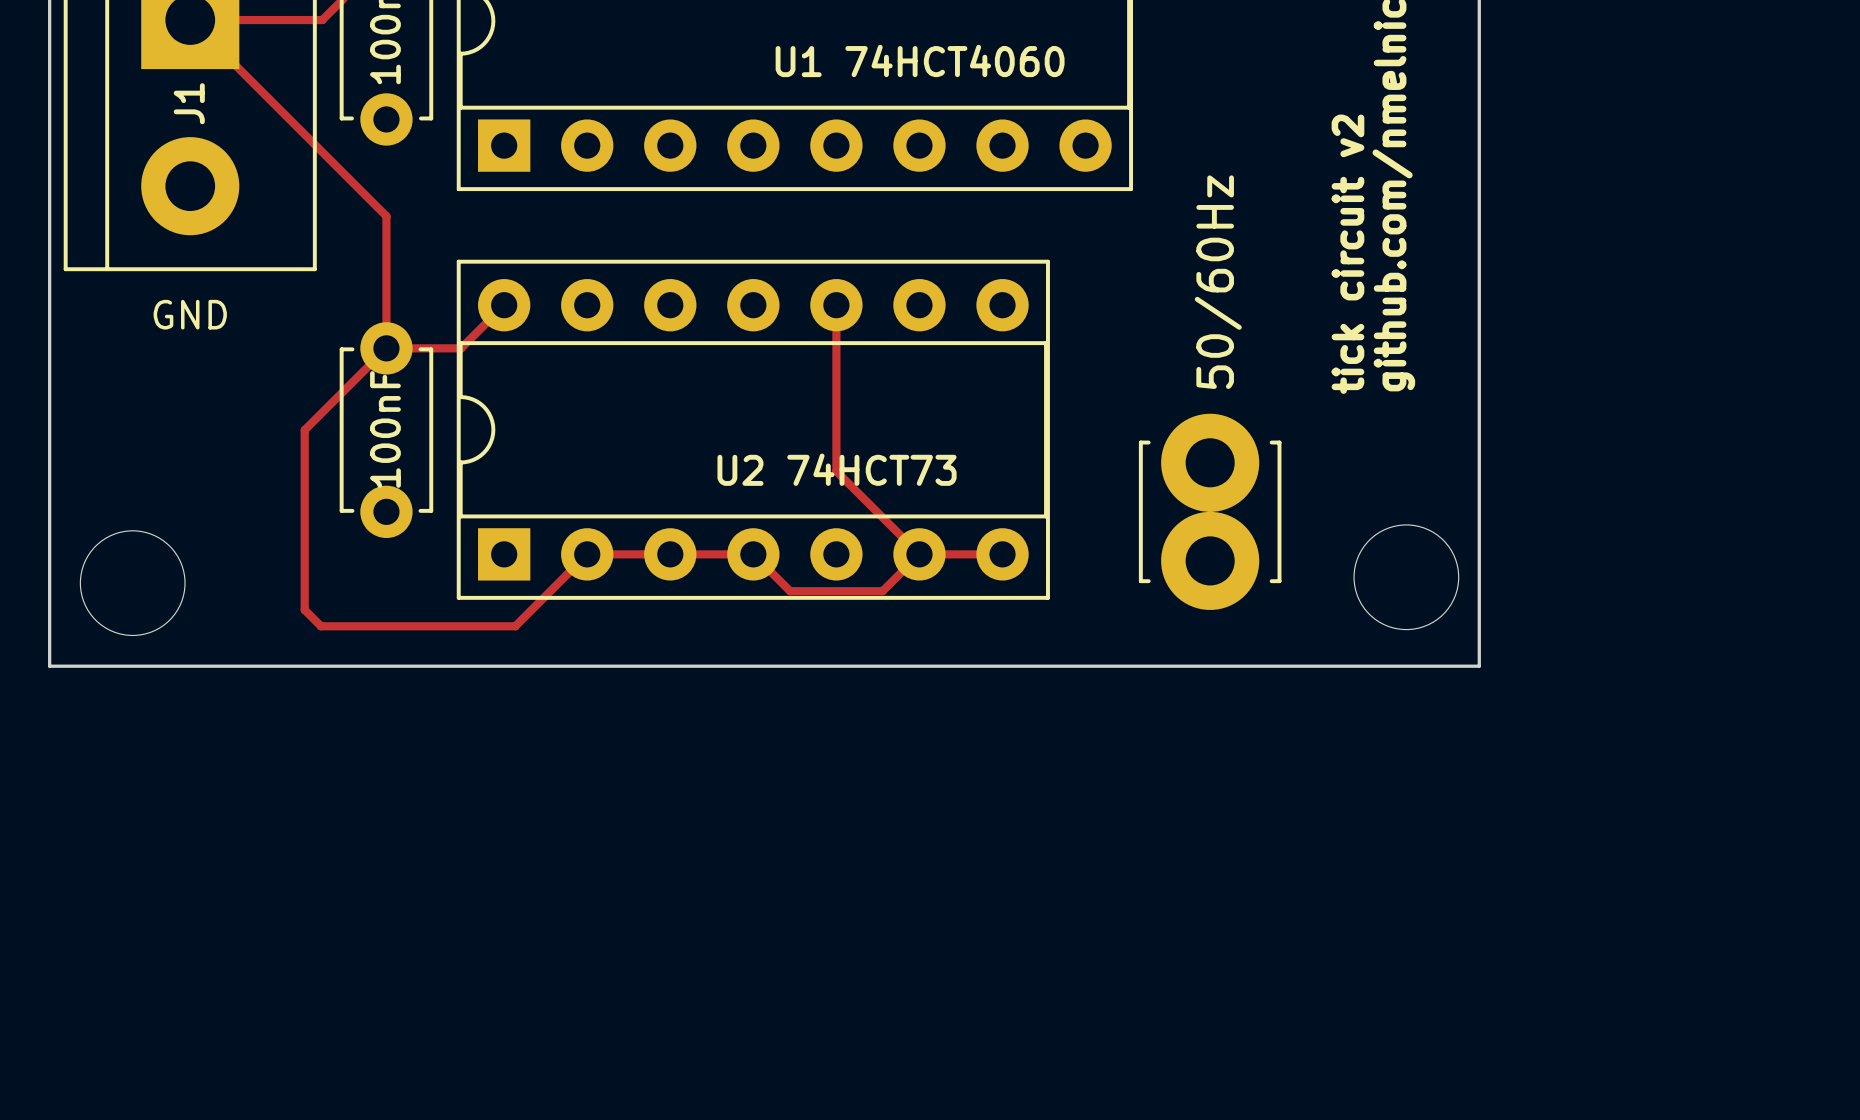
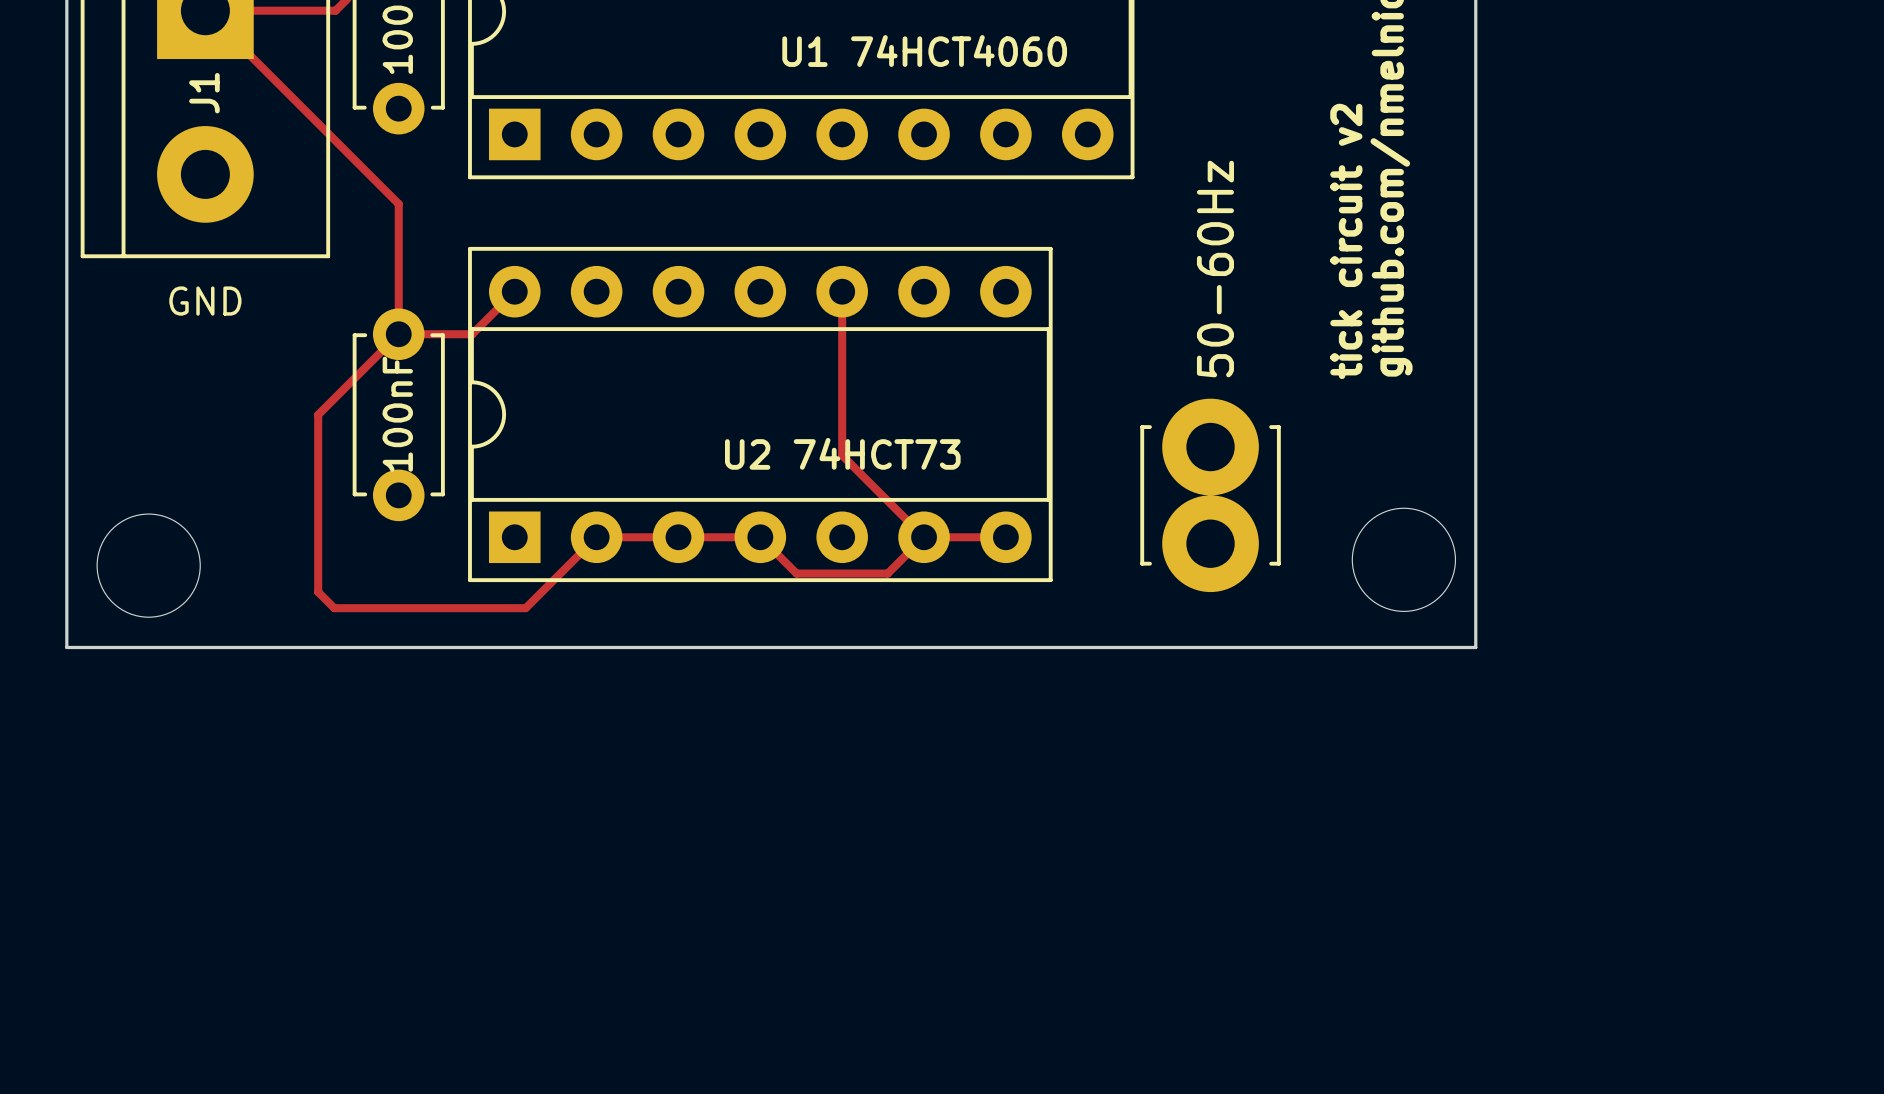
50/60Hz name: 50/60Hz (1218, 282) -> 50-60Hz (1215, 269)

